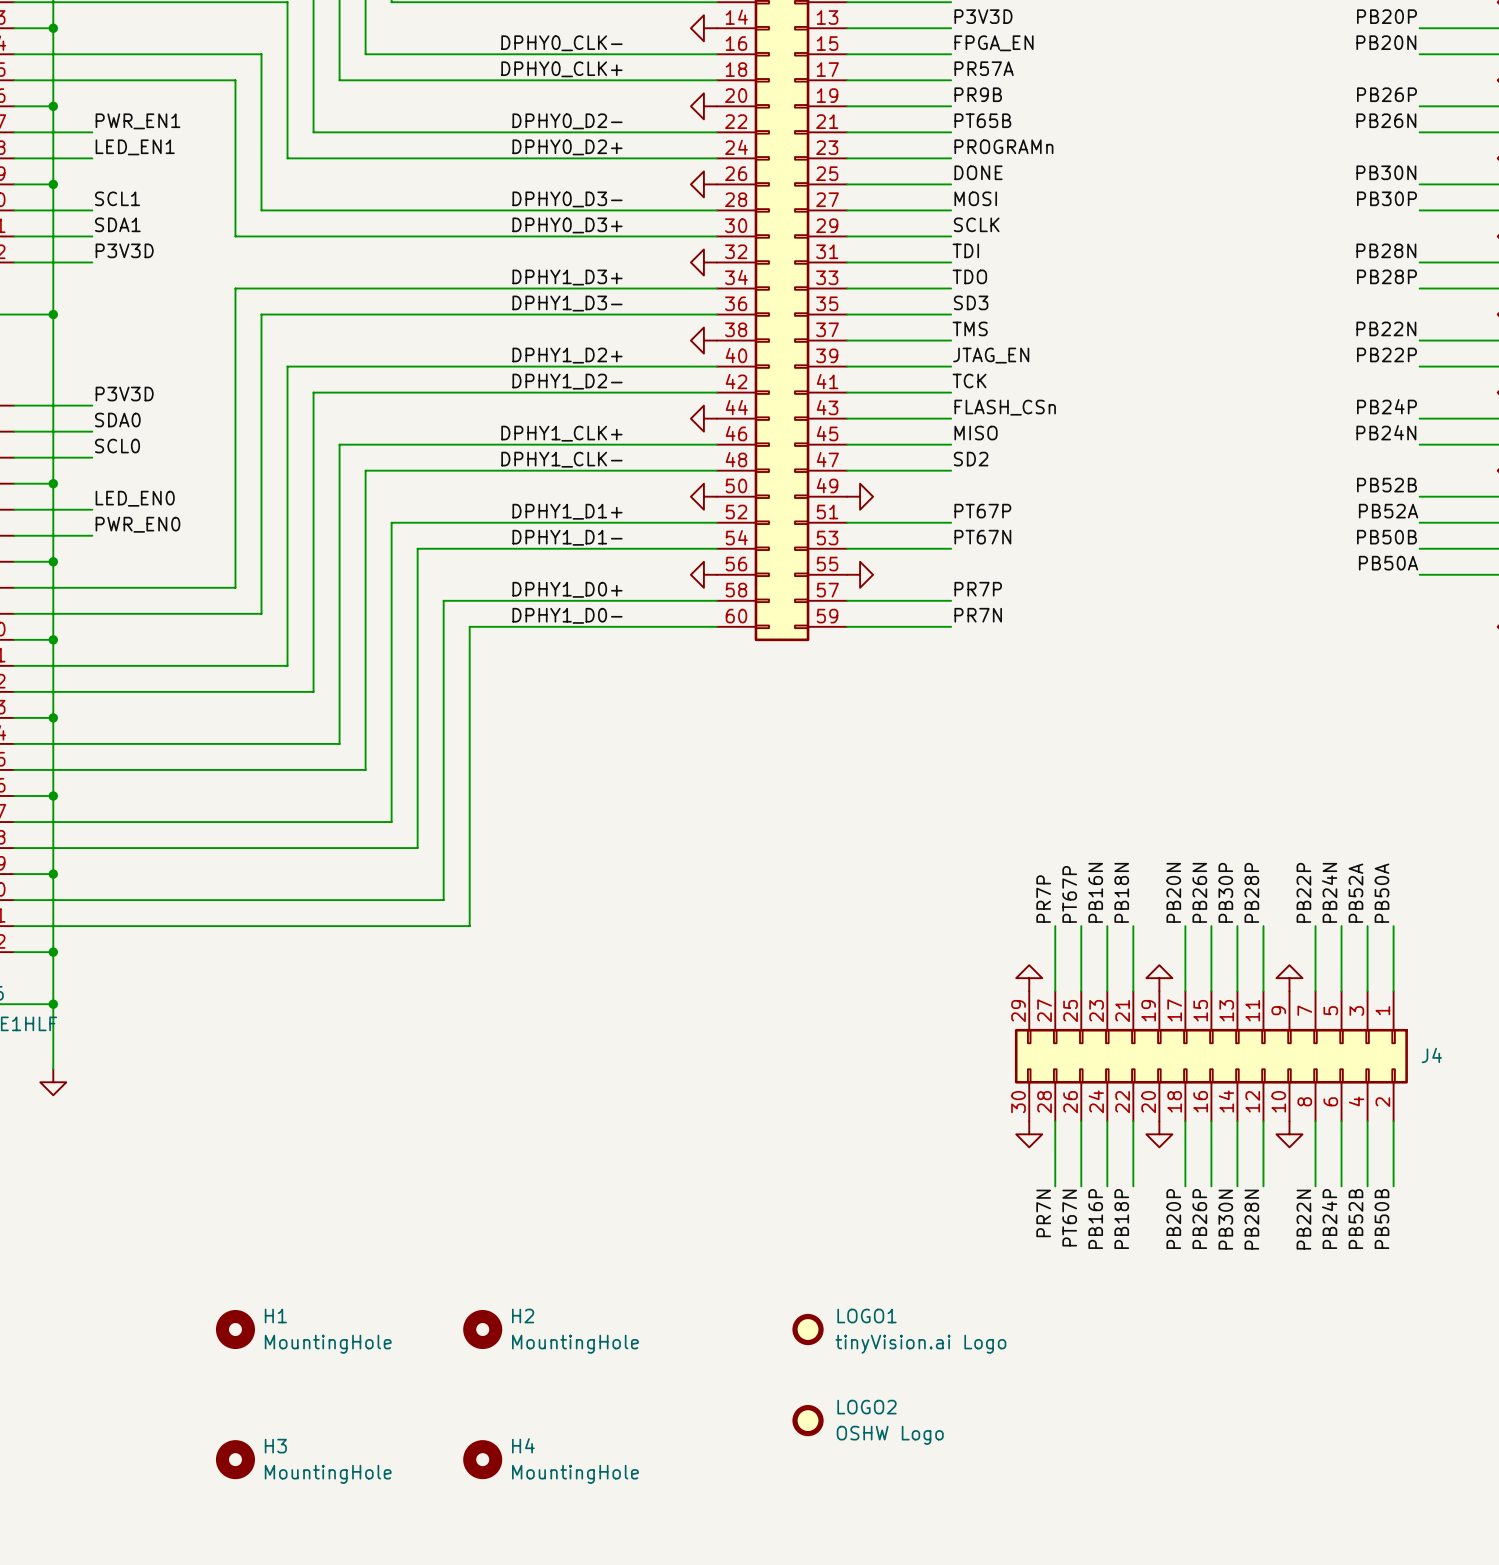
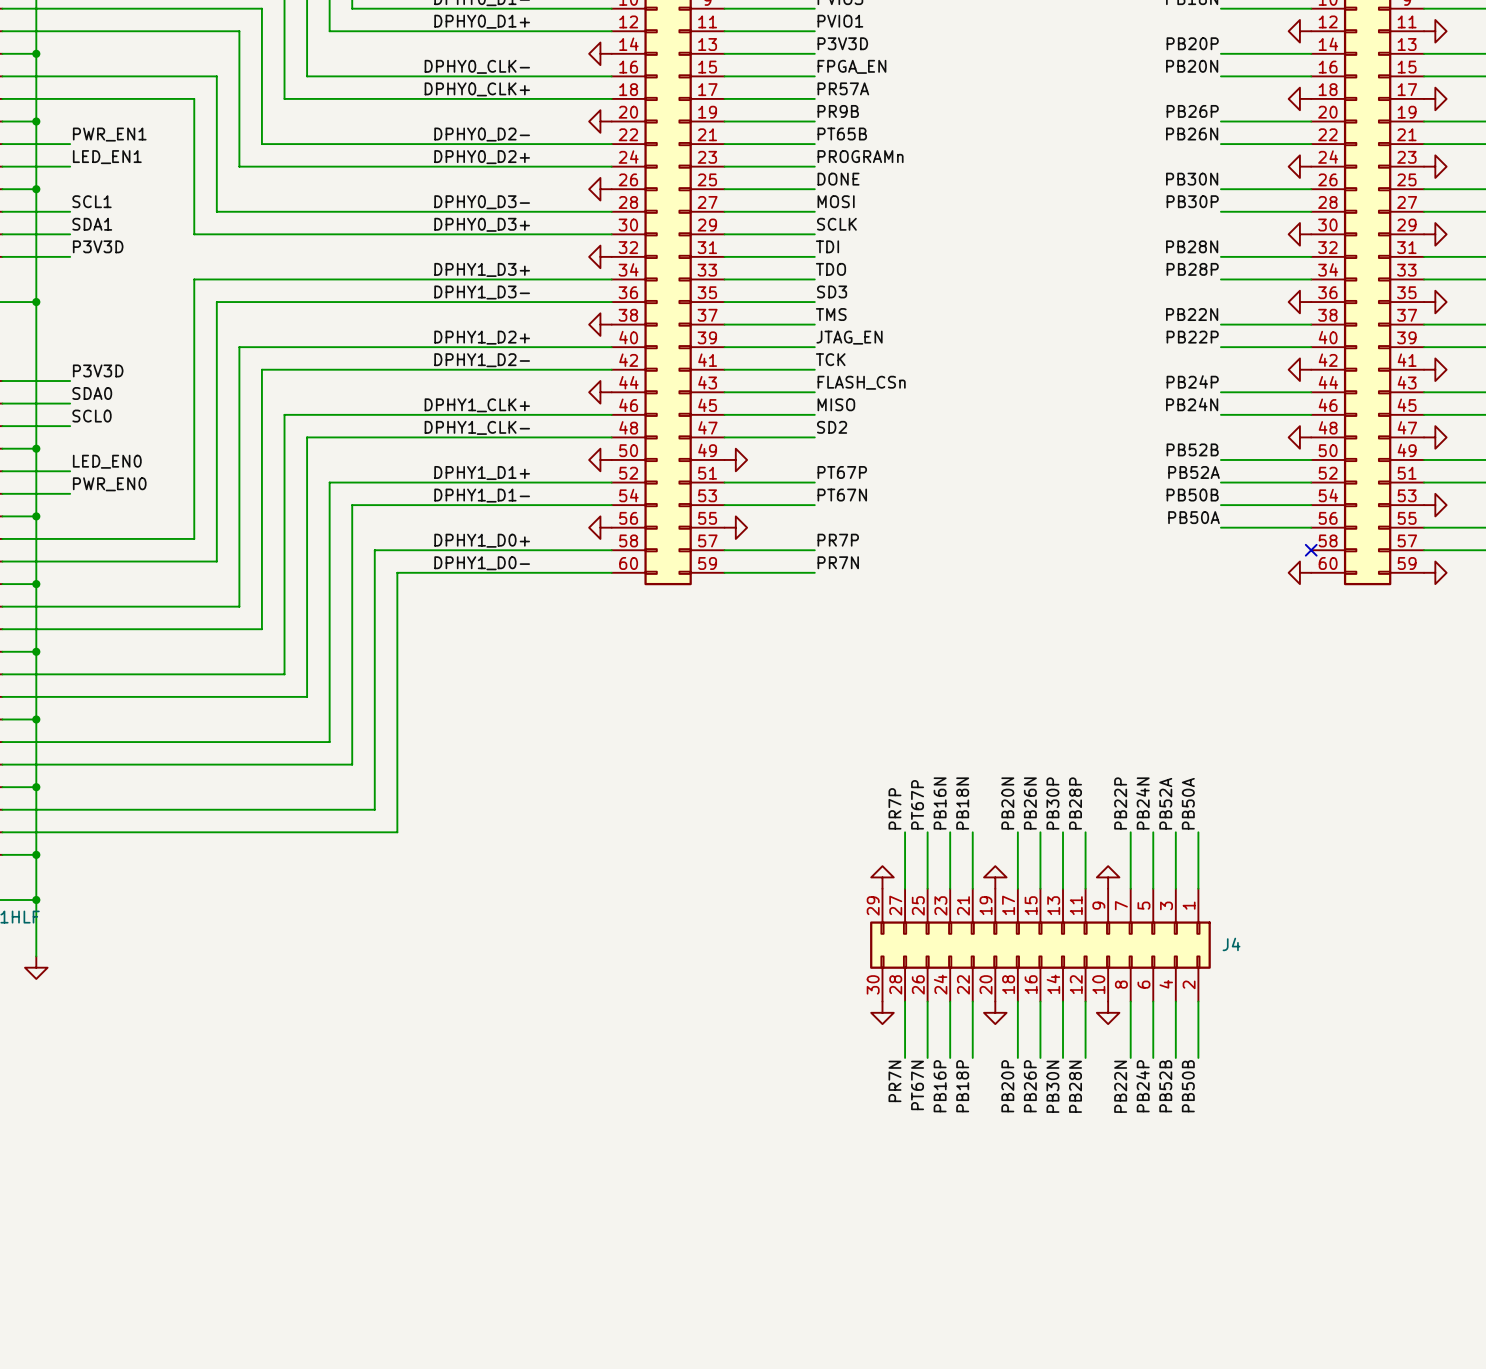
H1: MountingHole (235, 1329) -> none
H2: MountingHole (482, 1329) -> none
LOGO1: tinyVision.ai Logo (808, 1329) -> none
LOGO2: OSHW Logo (808, 1420) -> none
H3: MountingHole (235, 1459) -> none
H4: MountingHole (482, 1459) -> none

